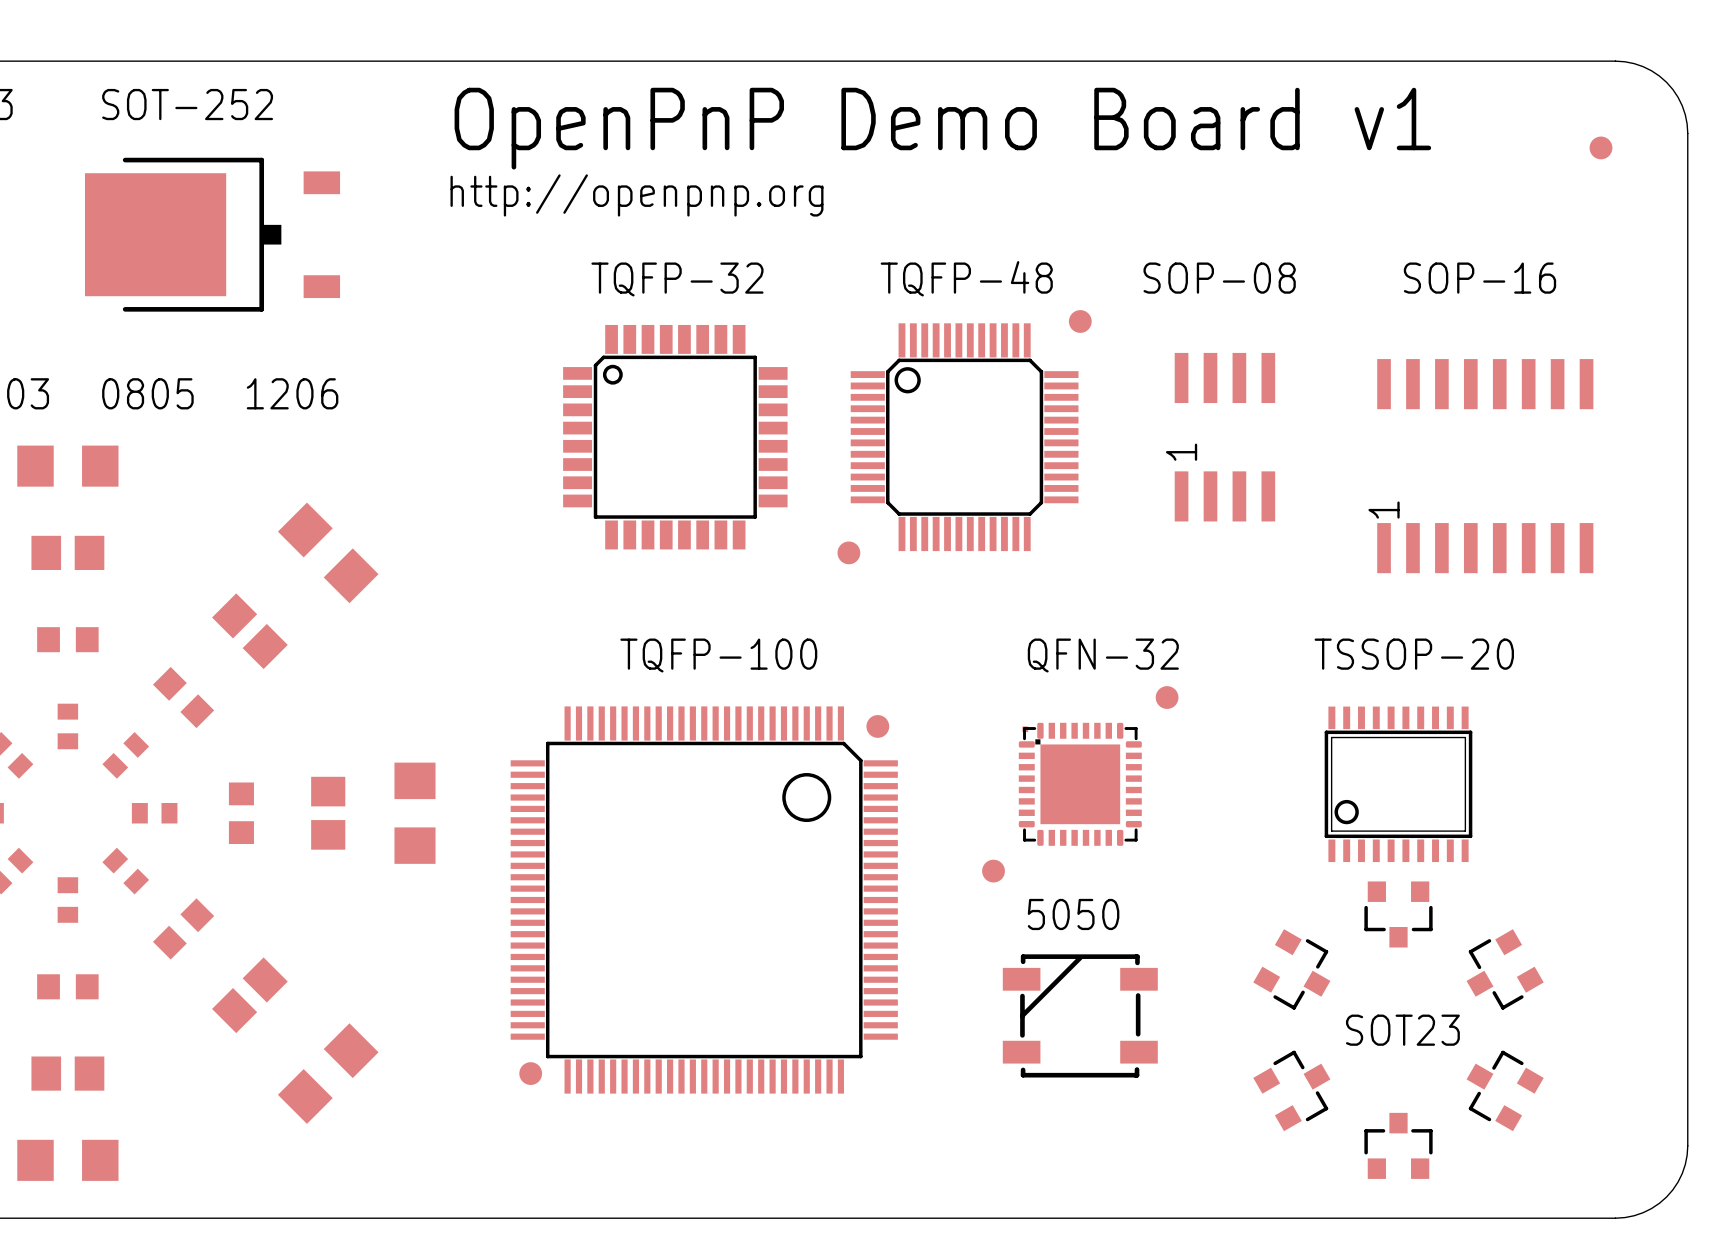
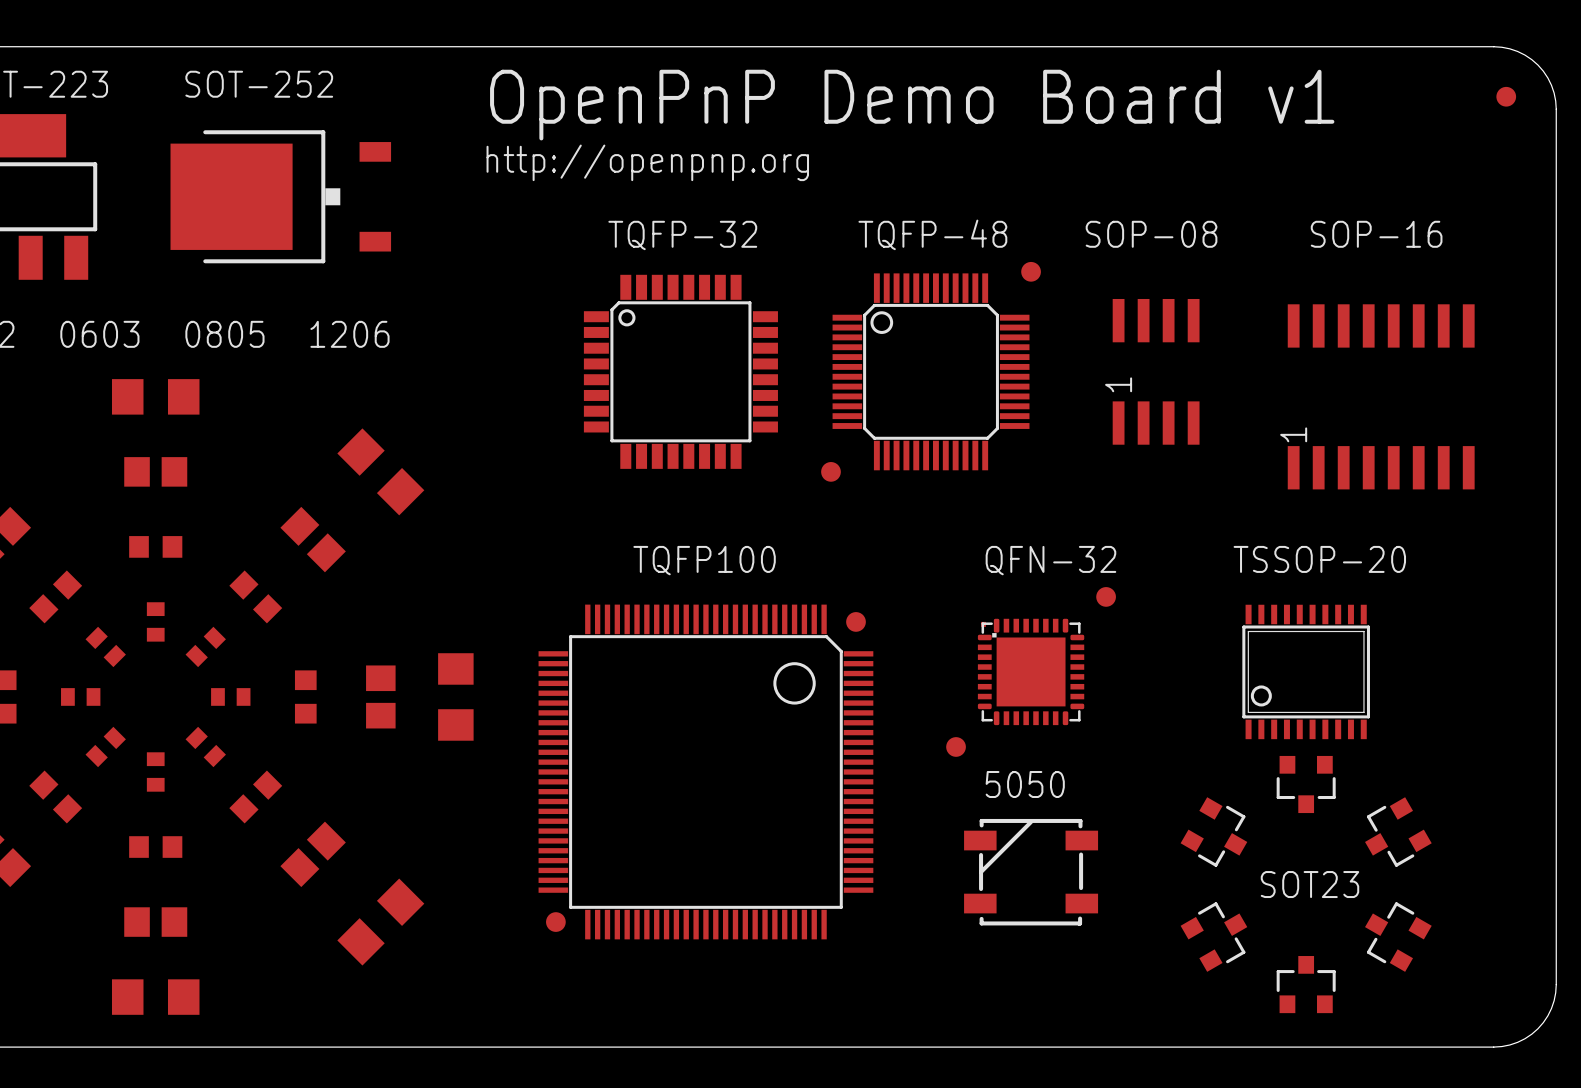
part position: (1600, 147) -> (1506, 96)
text: TQFP-100 (718, 655) -> TQFP100 (704, 560)

